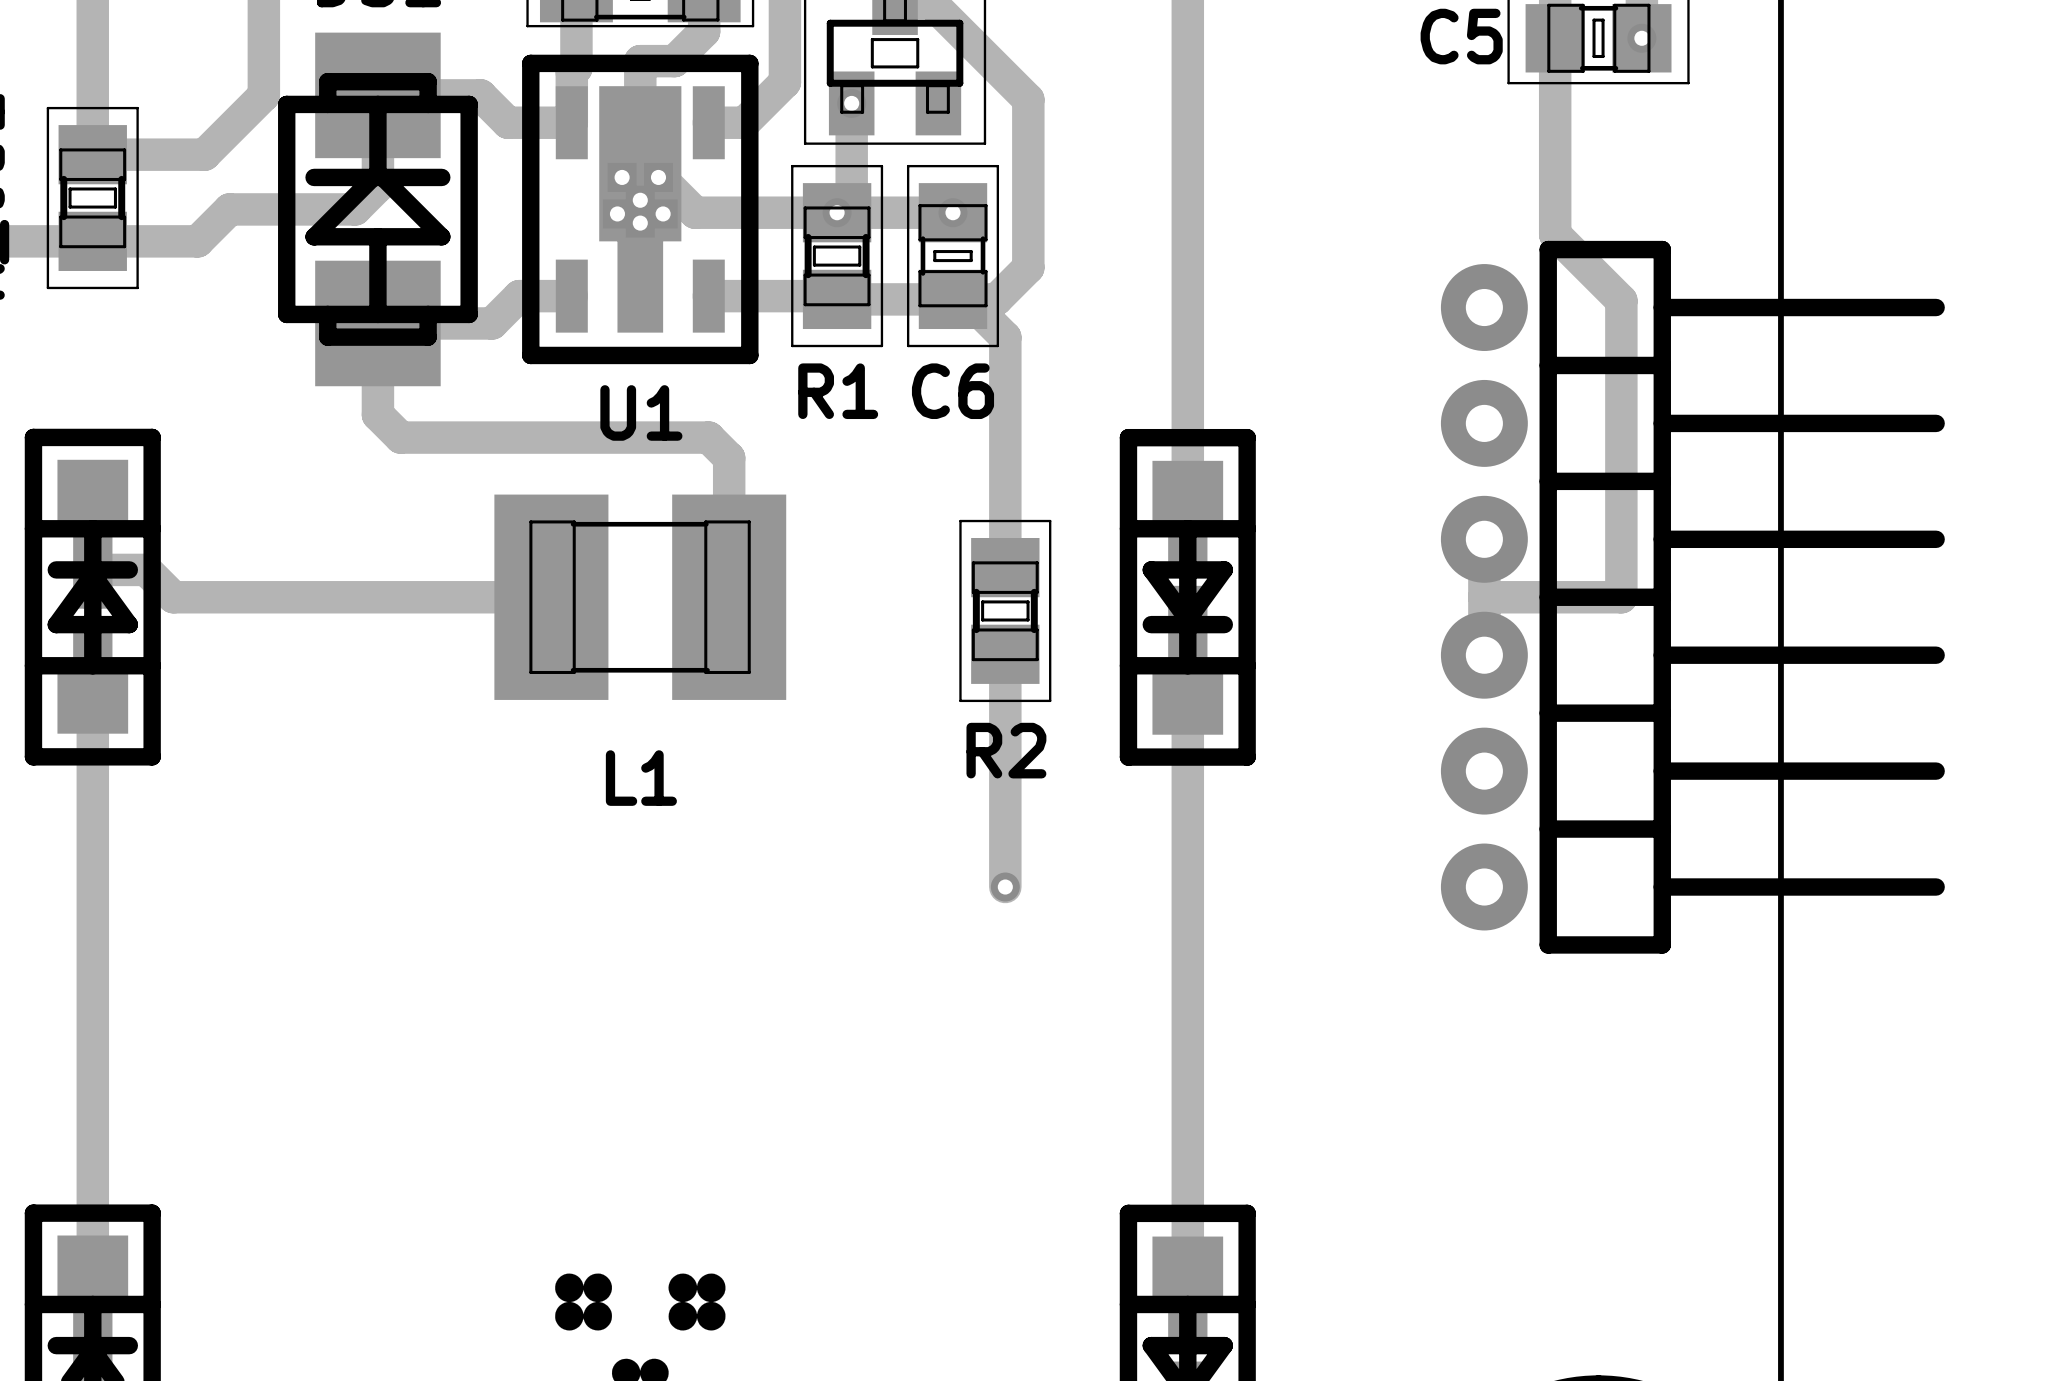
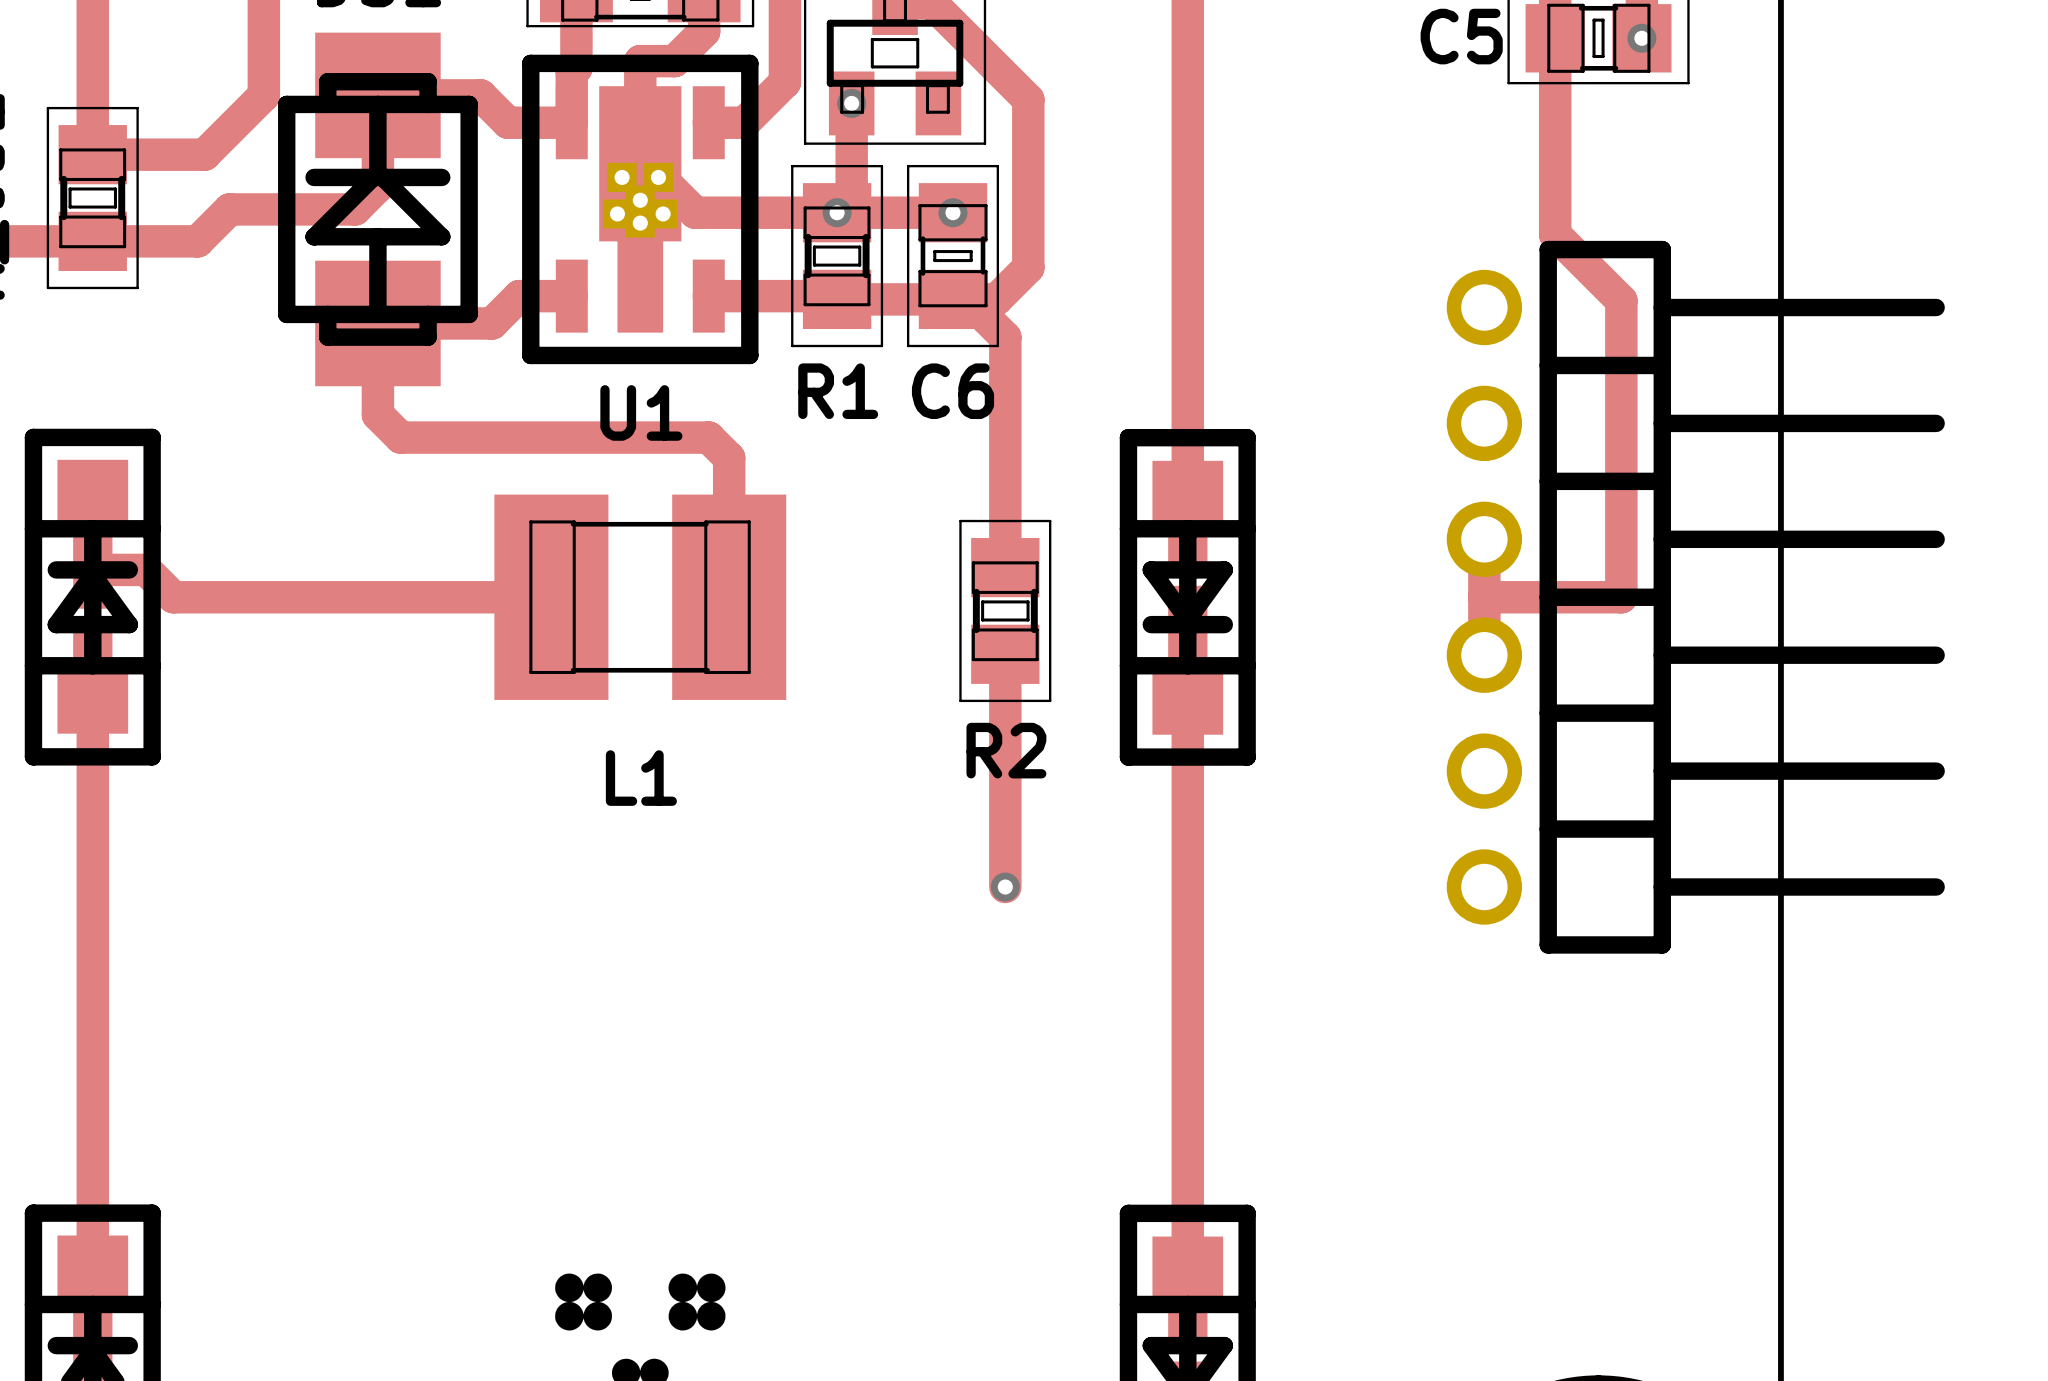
part footprint: [1440, 240, 1945, 954] -> [1446, 240, 1945, 954]

